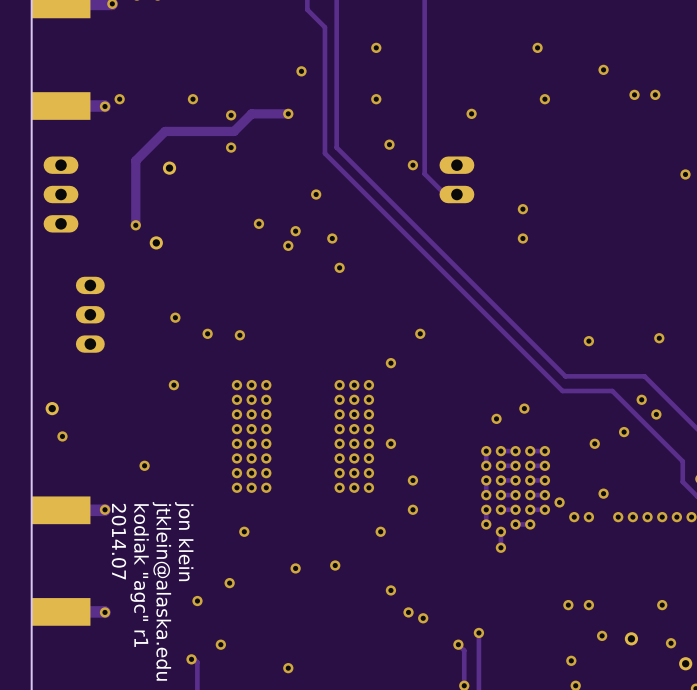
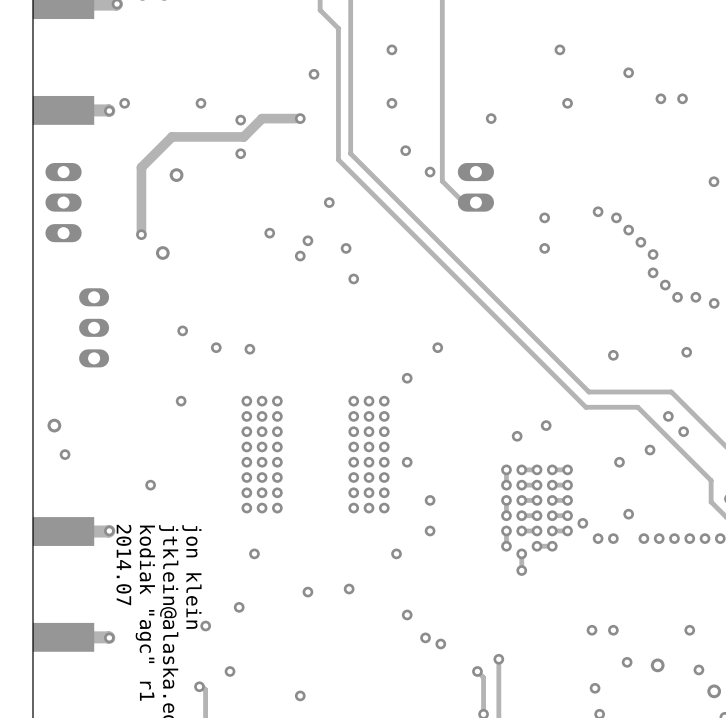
via: none -> (598, 211)
via: none -> (616, 217)
via: none -> (628, 230)
via: none -> (640, 242)
via: none -> (653, 254)
via: none -> (653, 272)
via: none -> (665, 285)
via: none -> (677, 297)
via: none -> (695, 297)
via: none -> (714, 303)

